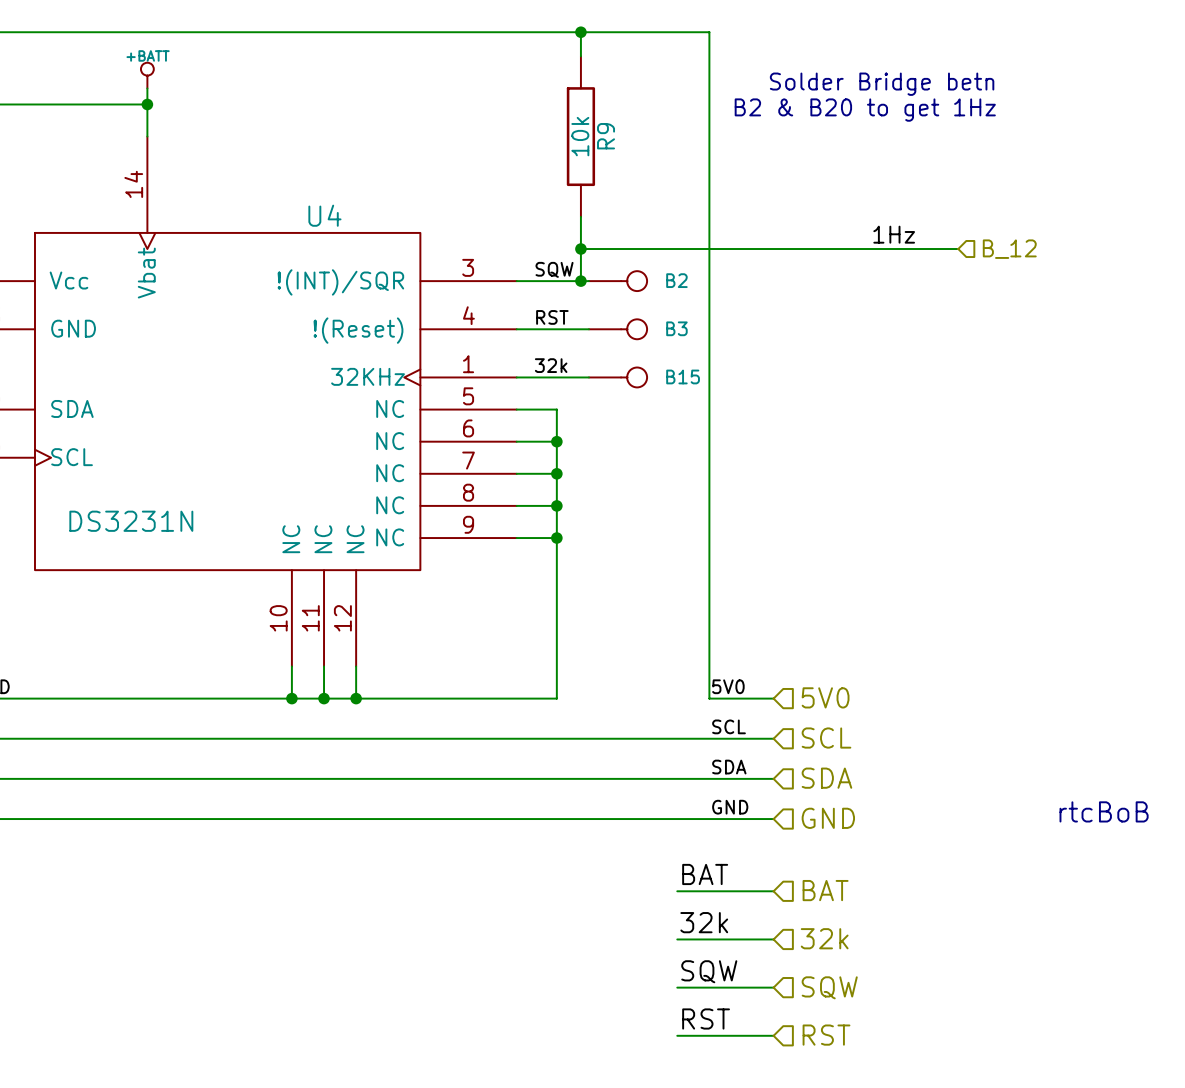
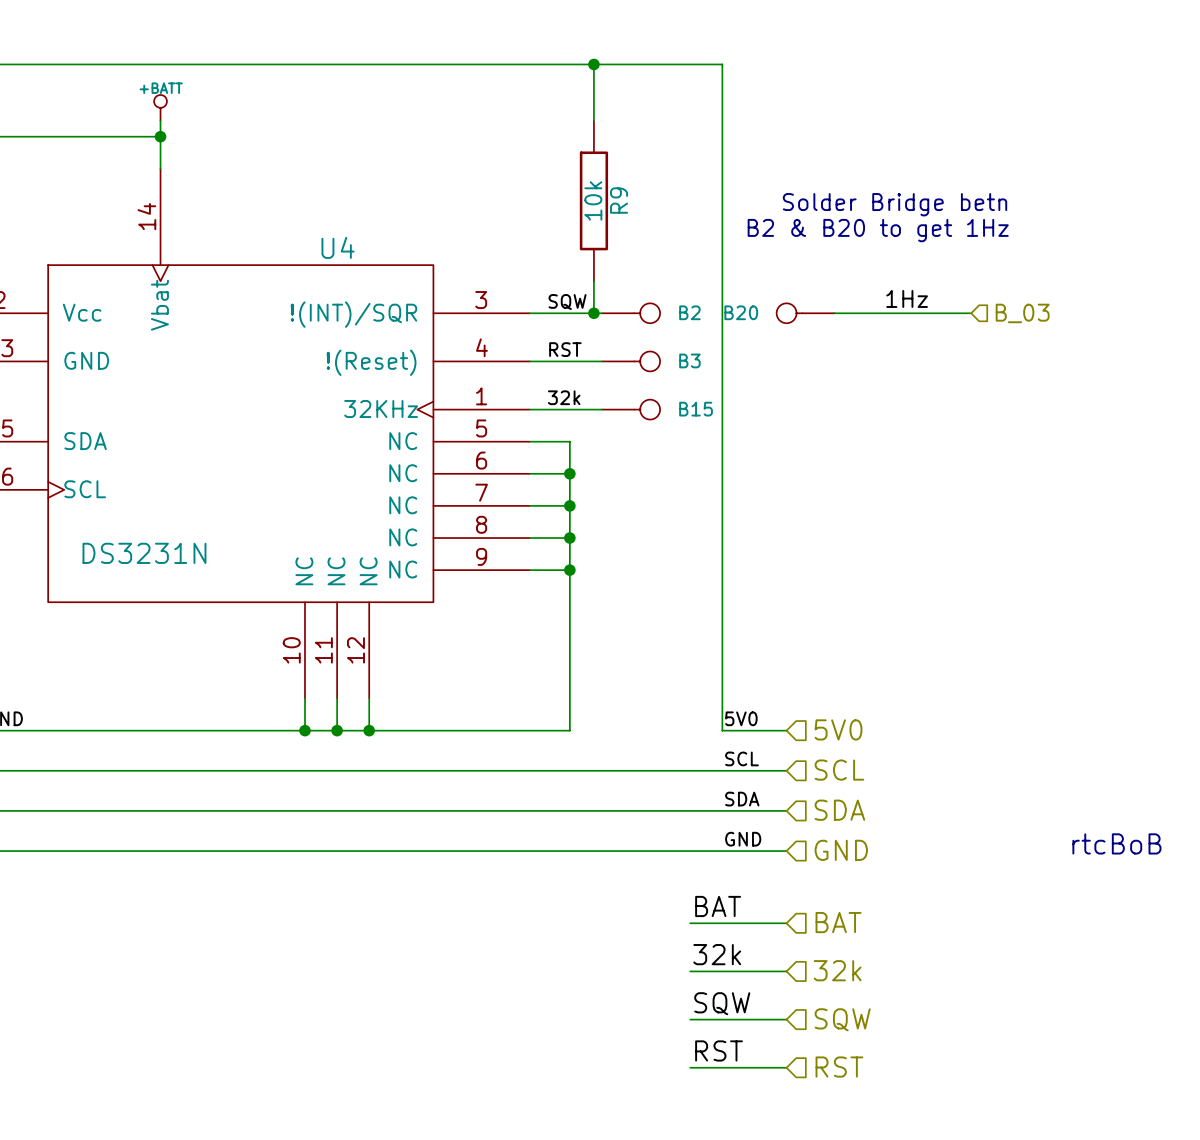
text position: Solder Bridge betn (882, 84) -> Solder Bridge betn (895, 204)
text position: B2 & B20 to get 1Hz (865, 110) -> B2 & B20 to get 1Hz (878, 230)
R9 position: (580, 136) -> (593, 200)
wire: (580, 216) (580, 249) (958, 249) -> none
label position: 1Hz (894, 234) -> 1Hz (907, 298)
junction: (580, 249) -> none
hierarchical label: B_12 (1009, 249) -> none
B20: none -> (805, 313)
wire: none -> (834, 313) (971, 313)
hierarchical label: none -> B_03 (1022, 313)

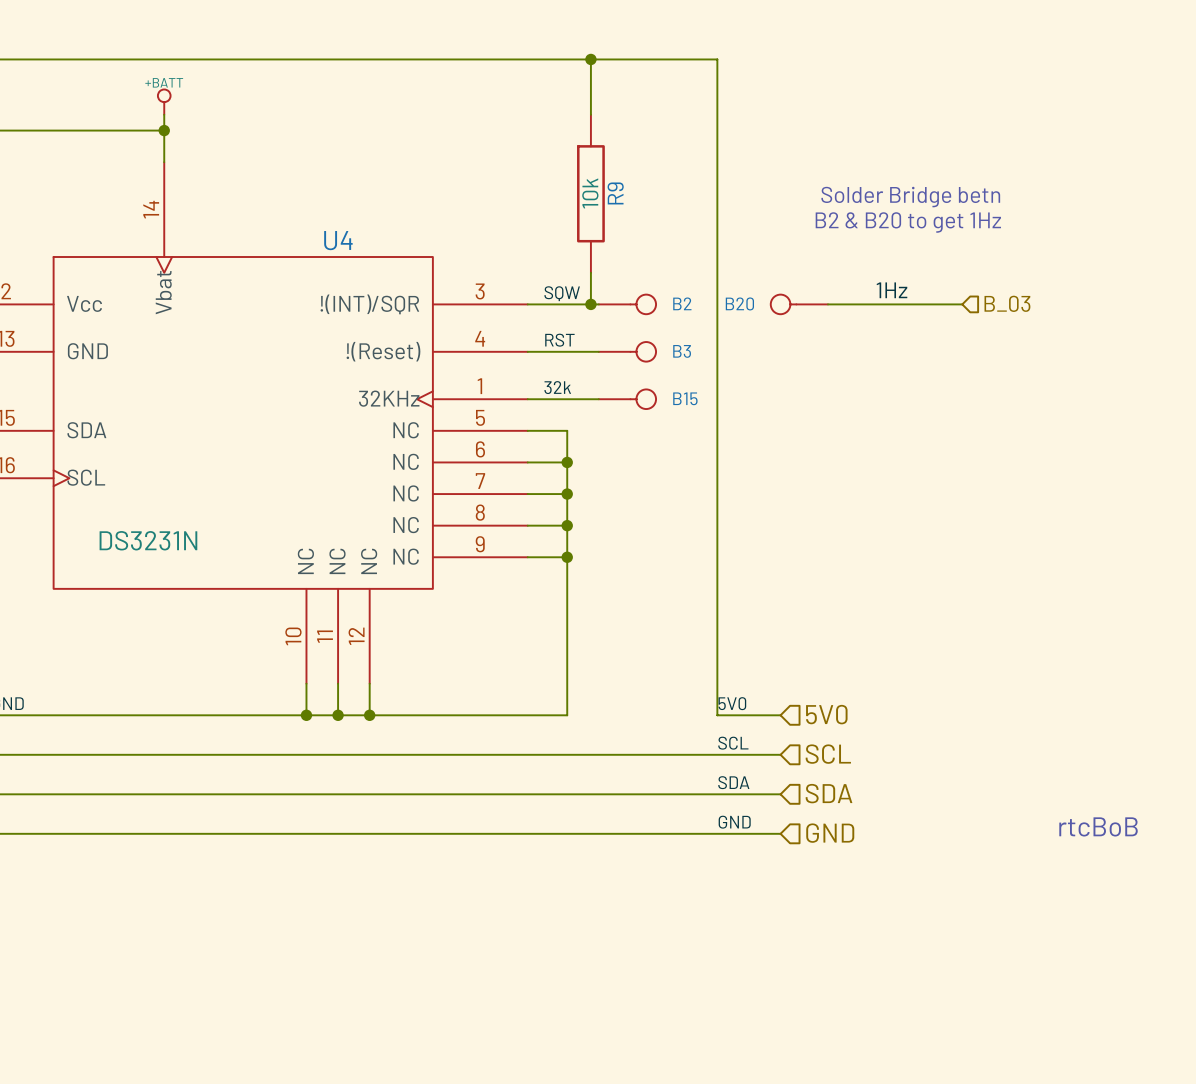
label: BAT (718, 906) -> none
hierarchical label: BAT (838, 922) -> none
wire: (690, 923) (786, 923) -> none
label: 32k (717, 954) -> none
hierarchical label: 32k (837, 970) -> none
wire: (690, 971) (786, 971) -> none
label: SQW (722, 1003) -> none
wire: (690, 1019) (786, 1019) -> none
hierarchical label: SQW (842, 1019) -> none
label: RST (719, 1050) -> none
wire: (690, 1067) (786, 1067) -> none
hierarchical label: RST (839, 1067) -> none

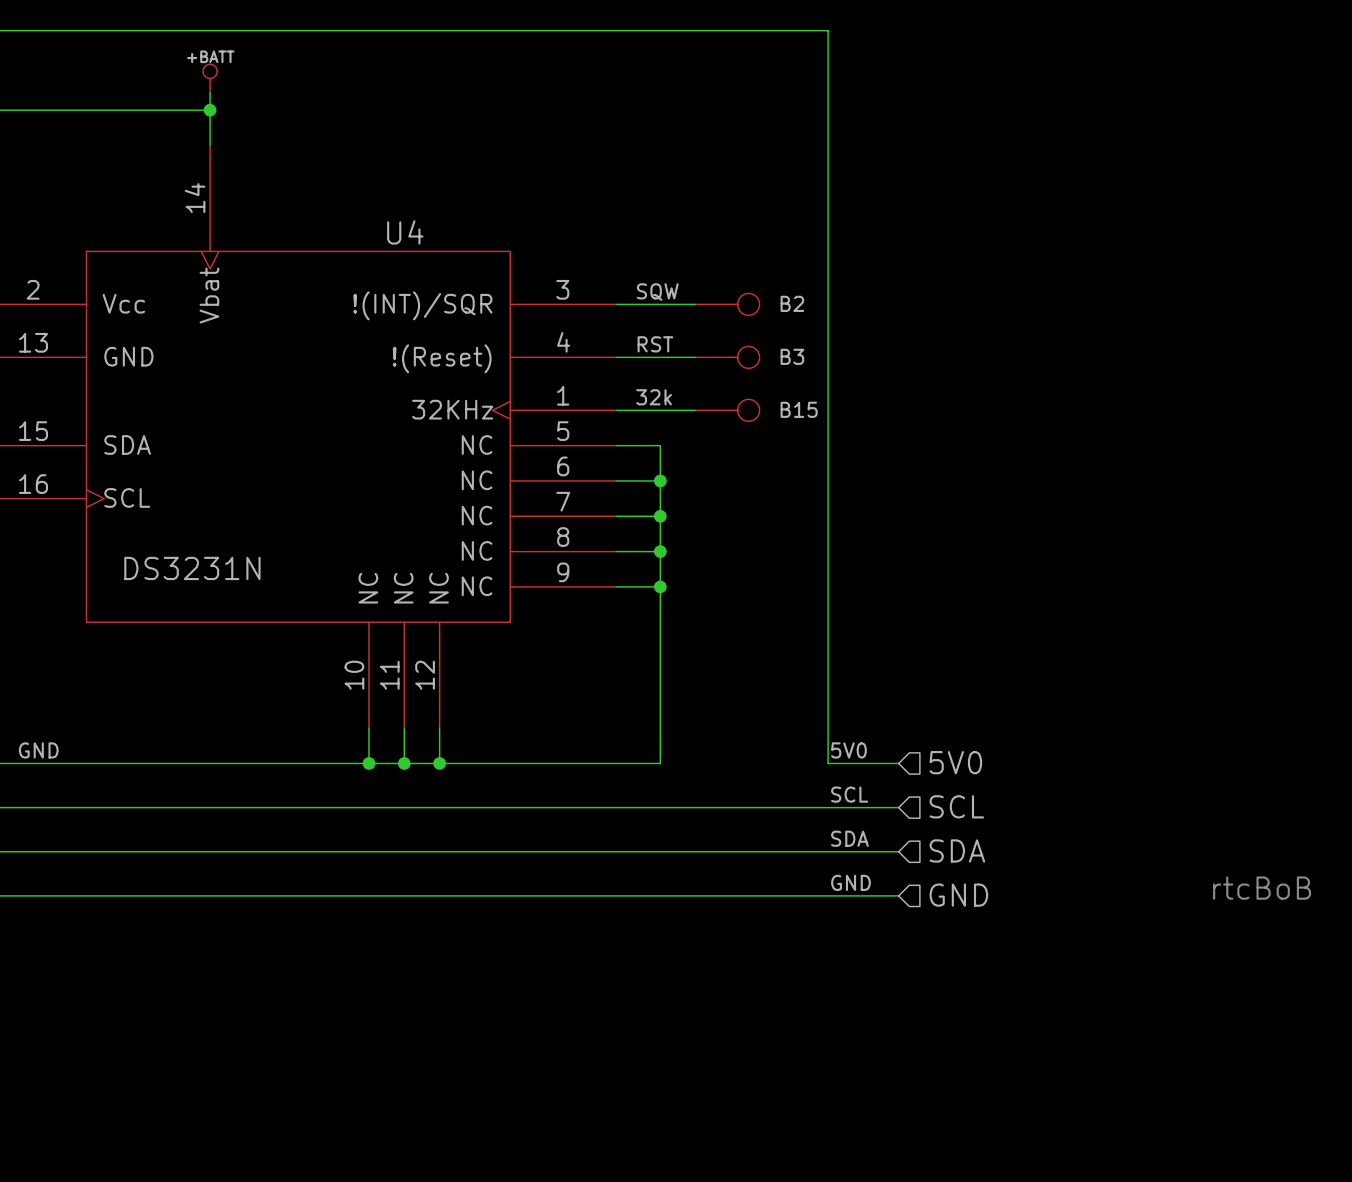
wire: (590, 59) (590, 114) -> none
junction: (590, 59) -> none
R9: 10k (590, 193) -> none
text: Solder Bridge betn (910, 197) -> none
text: B2 & B20 to get 1Hz (908, 222) -> none
wire: (590, 272) (590, 304) -> none
label: 1Hz (892, 290) -> none
hierarchical label: B_03 (1007, 303) -> none
junction: (590, 304) -> none
B20: (799, 304) -> none
wire: (827, 304) (962, 304) -> none

